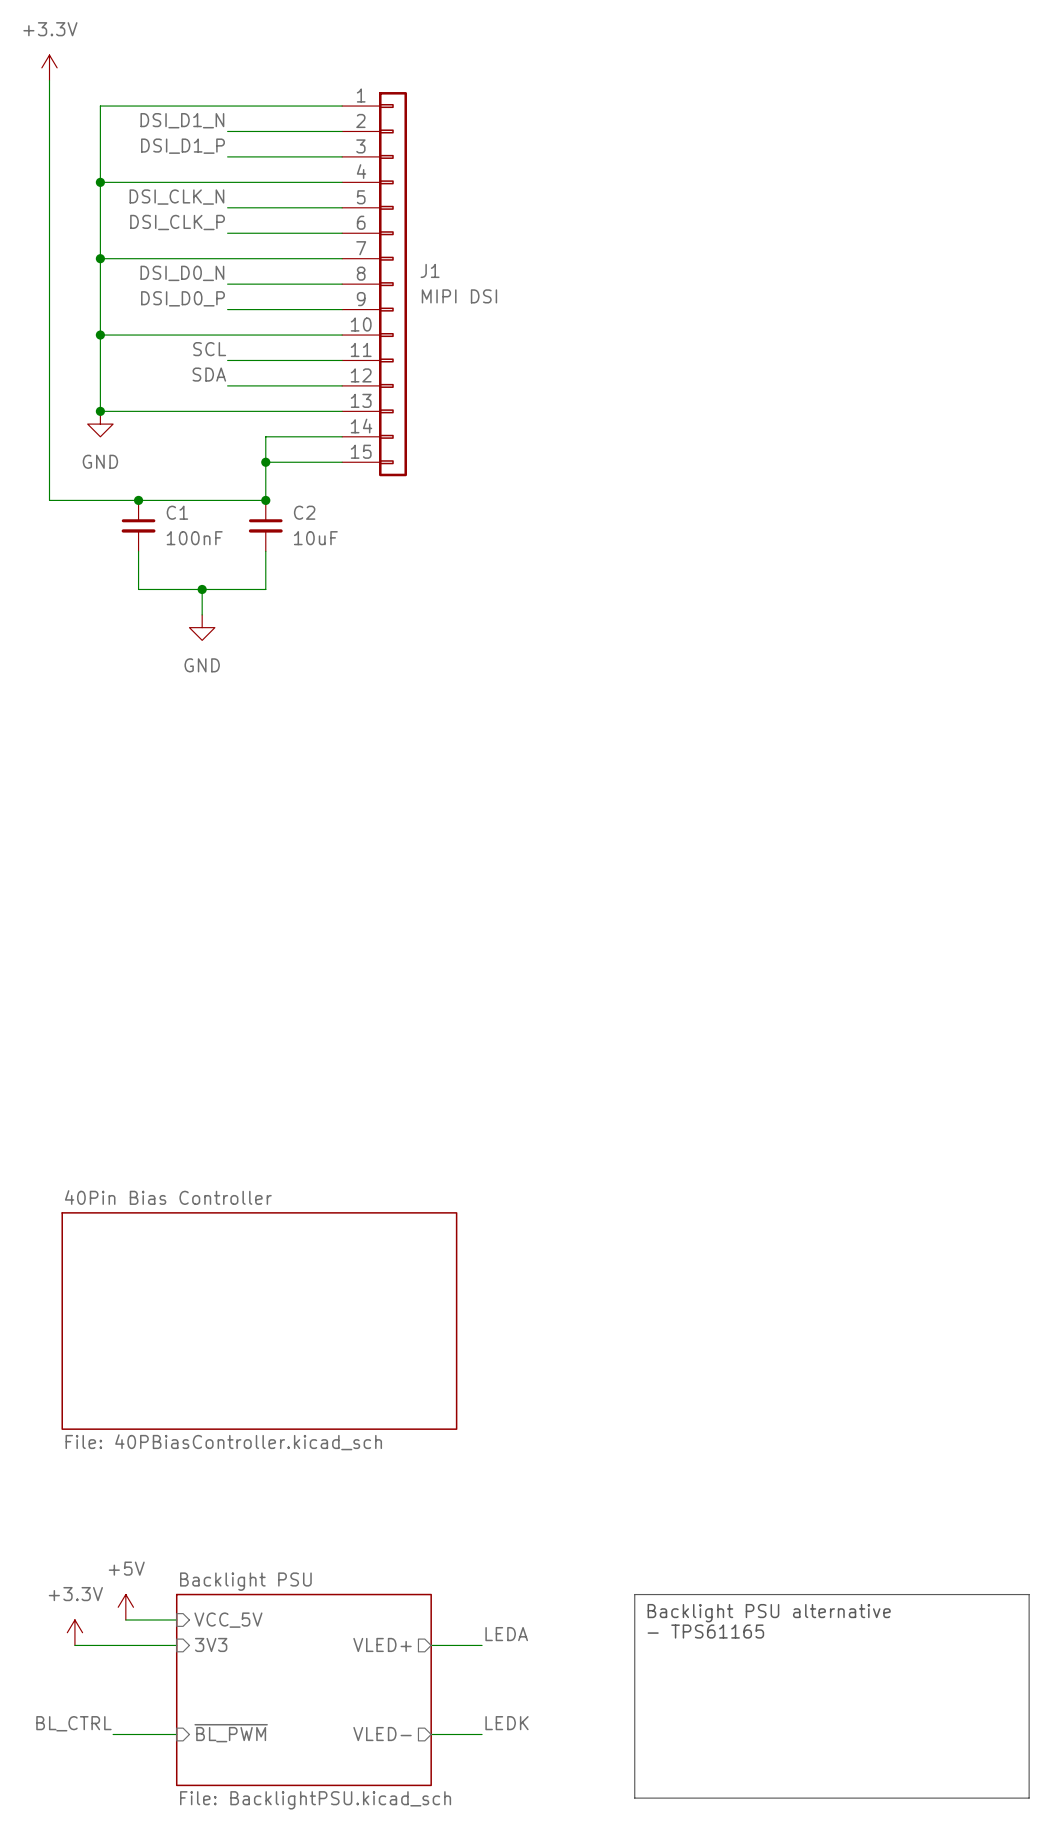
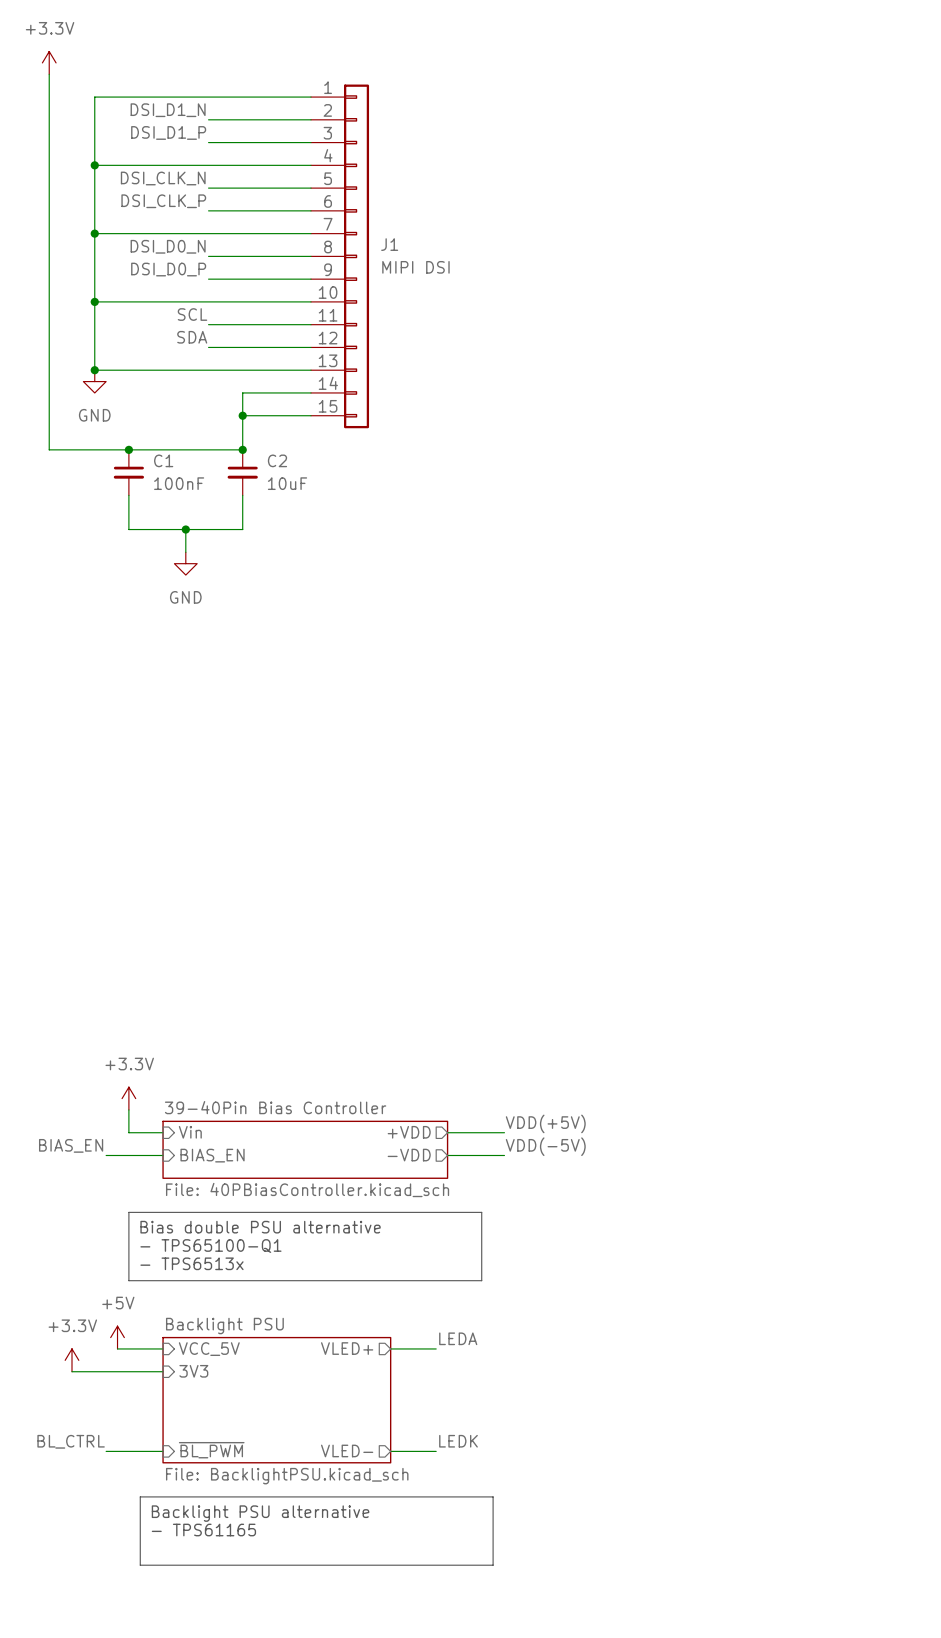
power symbol: none -> +3.3V (128, 1098)
wire: none -> (128, 1109) (128, 1132) (163, 1132)
label: none -> VDD(+5V) (545, 1123)
sheet pin: none -> Vin (190, 1132)
sheet pin: none -> +VDD (409, 1132)
wire: none -> (447, 1132) (504, 1132)
label: none -> BIAS_EN (71, 1145)
label: none -> VDD(-5V) (545, 1146)
sheet 39-40Pin Bias Controller: none -> File: 40PBiasController.kicad_sch (305, 1149)
sheet pin: none -> -VDD (409, 1155)
wire: none -> (106, 1155) (163, 1155)
sheet pin: none -> BIAS_EN (212, 1155)
wire: none -> (447, 1155) (504, 1155)
sheet 40Pin Bias Controller: File: 40PBiasController.kicad_sch (259, 1321) -> none
line: none -> (128, 1212) (481, 1212) (481, 1280) (128, 1280) (128, 1212)
text: none -> Bias double PSU alternative (260, 1227)
text: none -> - TPS65100-Q1 (210, 1246)
text: none -> - TPS6513x (191, 1263)
wire: none -> (117, 1348) (163, 1348)
sheet pin: none -> VCC_5V (209, 1349)
sheet Backlight PSU: none -> File: BacklightPSU.kicad_sch (276, 1400)
line: (634, 1594) (1029, 1594) (1029, 1798) (634, 1798) (634, 1594) -> none
power symbol position: +5V (125, 1607) -> +5V (117, 1337)
text: Backlight PSU alternative (769, 1613) -> none
wire: none -> (106, 1451) (117, 1451)
sheet pin: VCC_5V (228, 1620) -> ~{BL_PWM} (211, 1450)
text: - TPS61165 (705, 1631) -> none
power symbol position: +3.3V (74, 1632) -> +3.3V (71, 1360)
label position: LEDA (506, 1634) -> LEDA (458, 1338)
sheet pin position: 3V3 (211, 1644) -> 3V3 (193, 1371)
sheet pin position: VLED+ (382, 1644) -> VLED+ (347, 1348)
wire: (74, 1645) (176, 1645) -> (71, 1371) (163, 1371)
wire: (431, 1645) (482, 1645) -> (390, 1348) (436, 1348)
line: none -> (140, 1496) (493, 1496) (493, 1565) (140, 1565) (140, 1496)
text: none -> Backlight PSU alternative (260, 1513)
sheet Backlight PSU: File: BacklightPSU.kicad_sch (303, 1689) -> none
text: none -> - TPS61165 (203, 1530)
label position: BL_CTRL (73, 1723) -> BL_CTRL (71, 1441)
label position: LEDK (507, 1723) -> LEDK (458, 1441)
sheet pin: ~{BL_PWM} (231, 1733) -> none
wire: (113, 1734) (176, 1734) -> none
sheet pin position: VLED- (382, 1734) -> VLED- (347, 1450)
wire: (431, 1734) (482, 1734) -> (390, 1451) (436, 1451)

